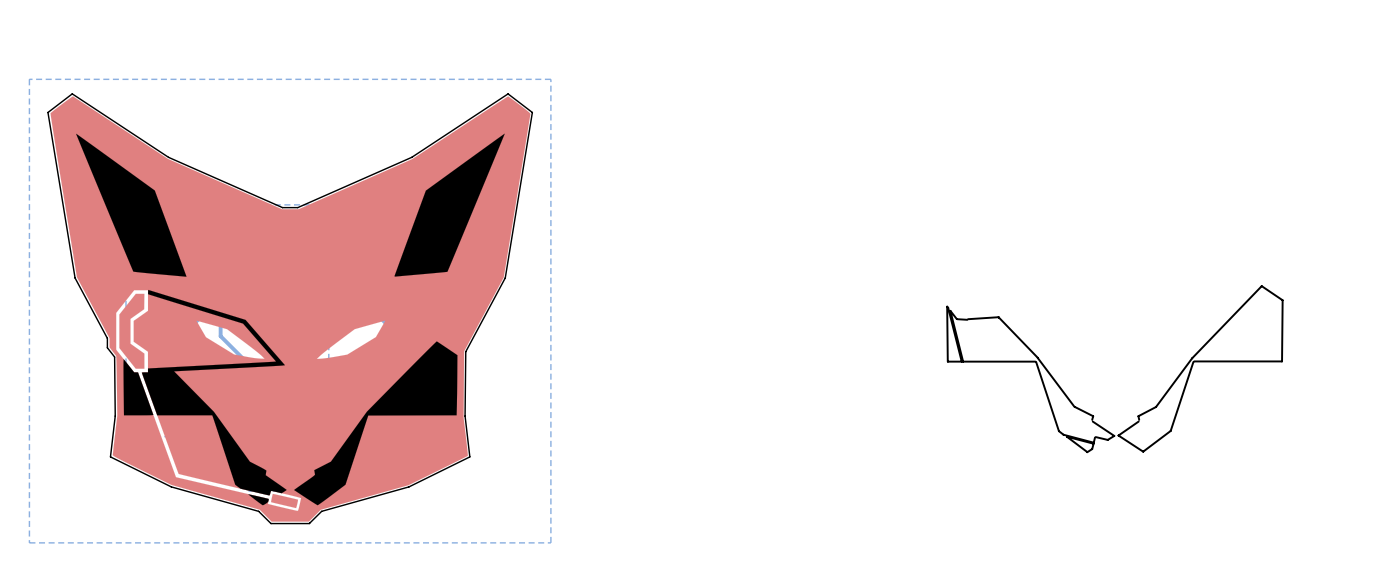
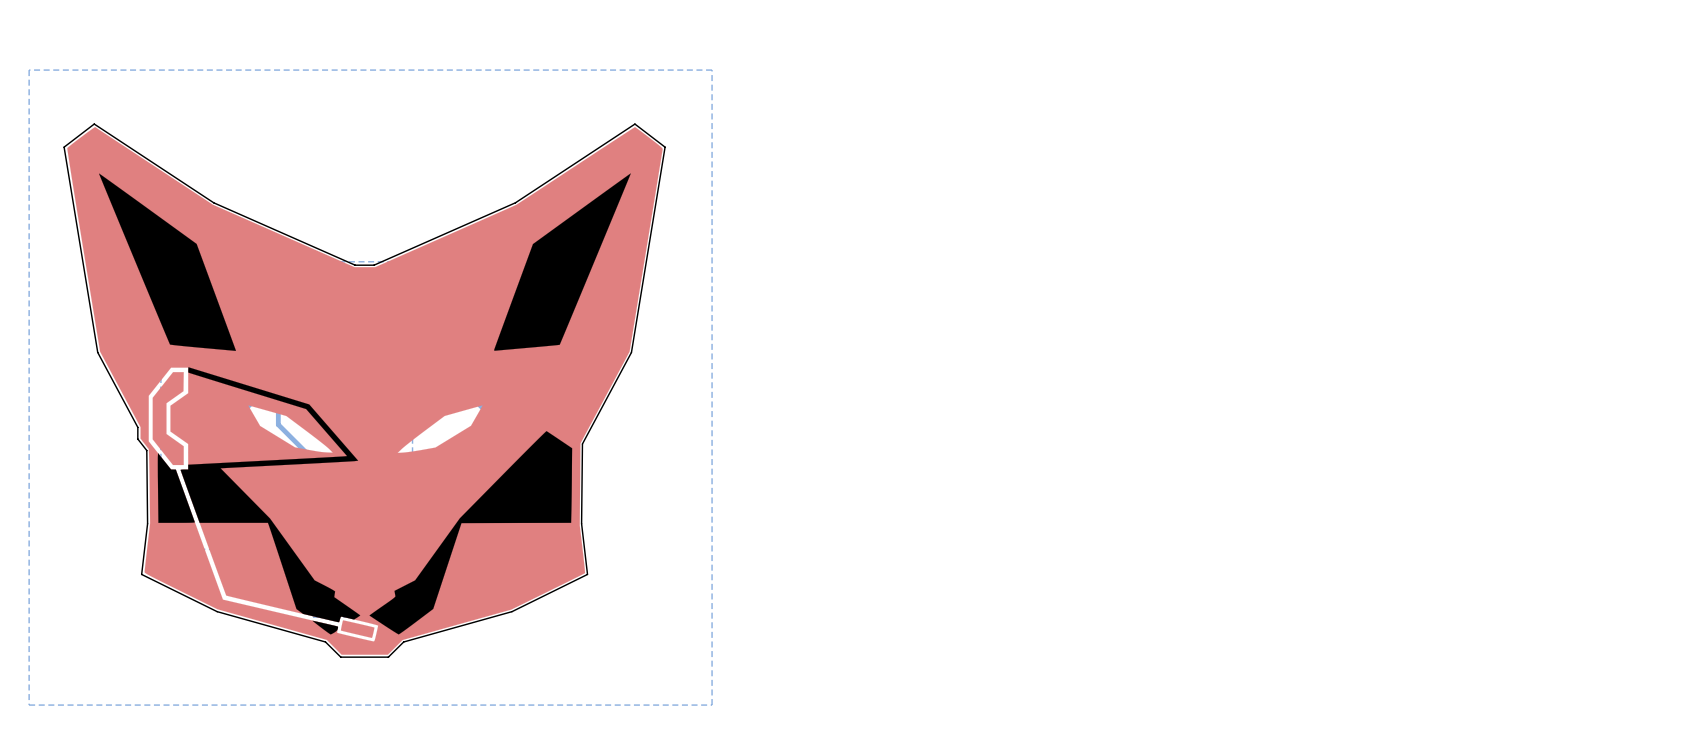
bottom zone outline: (29, 79) (550, 79) (550, 542) (29, 542) (29, 79) -> (29, 70) (29, 705) (712, 705) (712, 70) (29, 70)
line: (956, 319) (950, 310) (963, 361) (1035, 361) -> none
line: (957, 319) (967, 319) -> none
line: (968, 319) (998, 317) (1037, 357) (1074, 406) -> none
line: (947, 361) (947, 306) (961, 361) (947, 361) -> none
line: (1194, 361) (1281, 361) -> none
line: (1282, 361) (1282, 300) (1261, 286) (1192, 358) (1156, 406) (1138, 416) (1139, 419) -> none
line: (1036, 362) (1058, 431) (1063, 434) (1093, 442) (1094, 437) -> none
line: (1193, 362) (1170, 430) (1143, 451) (1118, 435) (1138, 421) -> none
line: (1075, 407) (1093, 416) (1092, 419) -> none
line: (1092, 421) (1114, 435) (1107, 439) (1095, 437) -> none
line: (1087, 451) (1066, 436) (1093, 443) (1092, 449) (1087, 452) -> none

